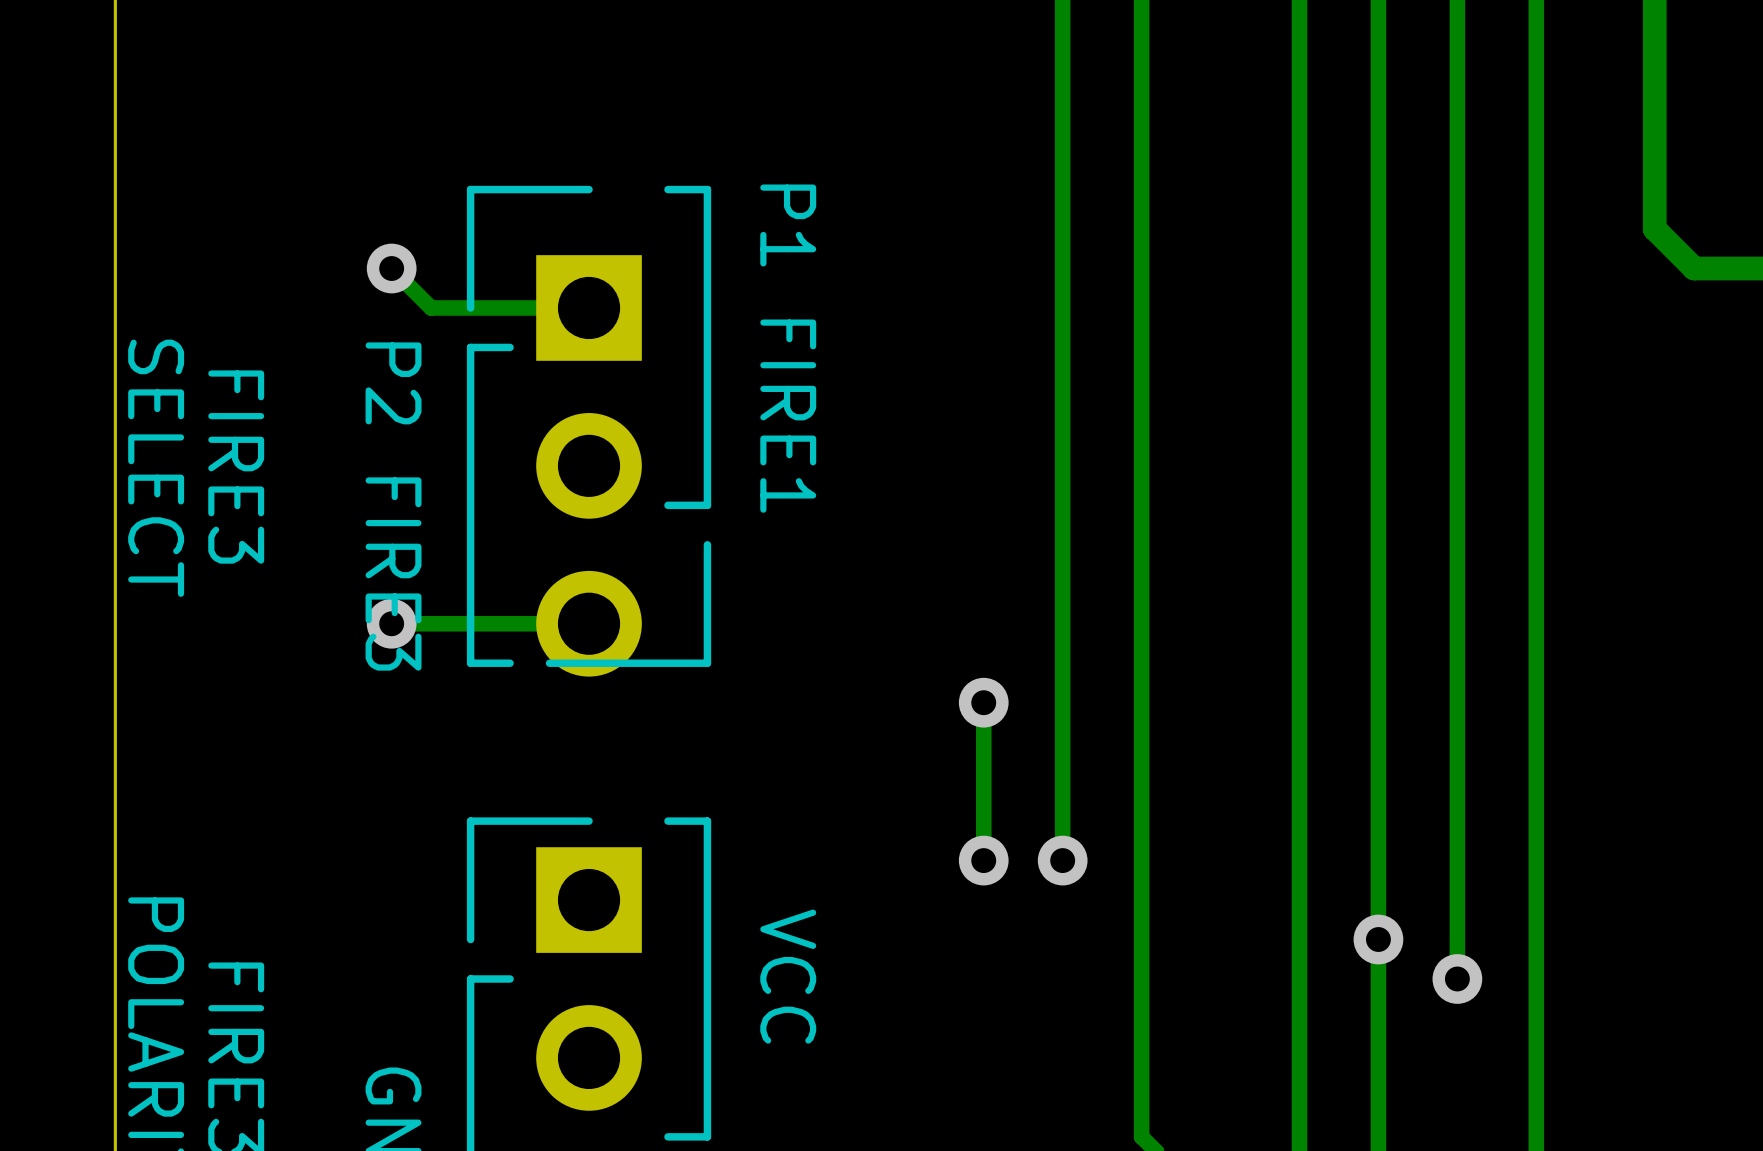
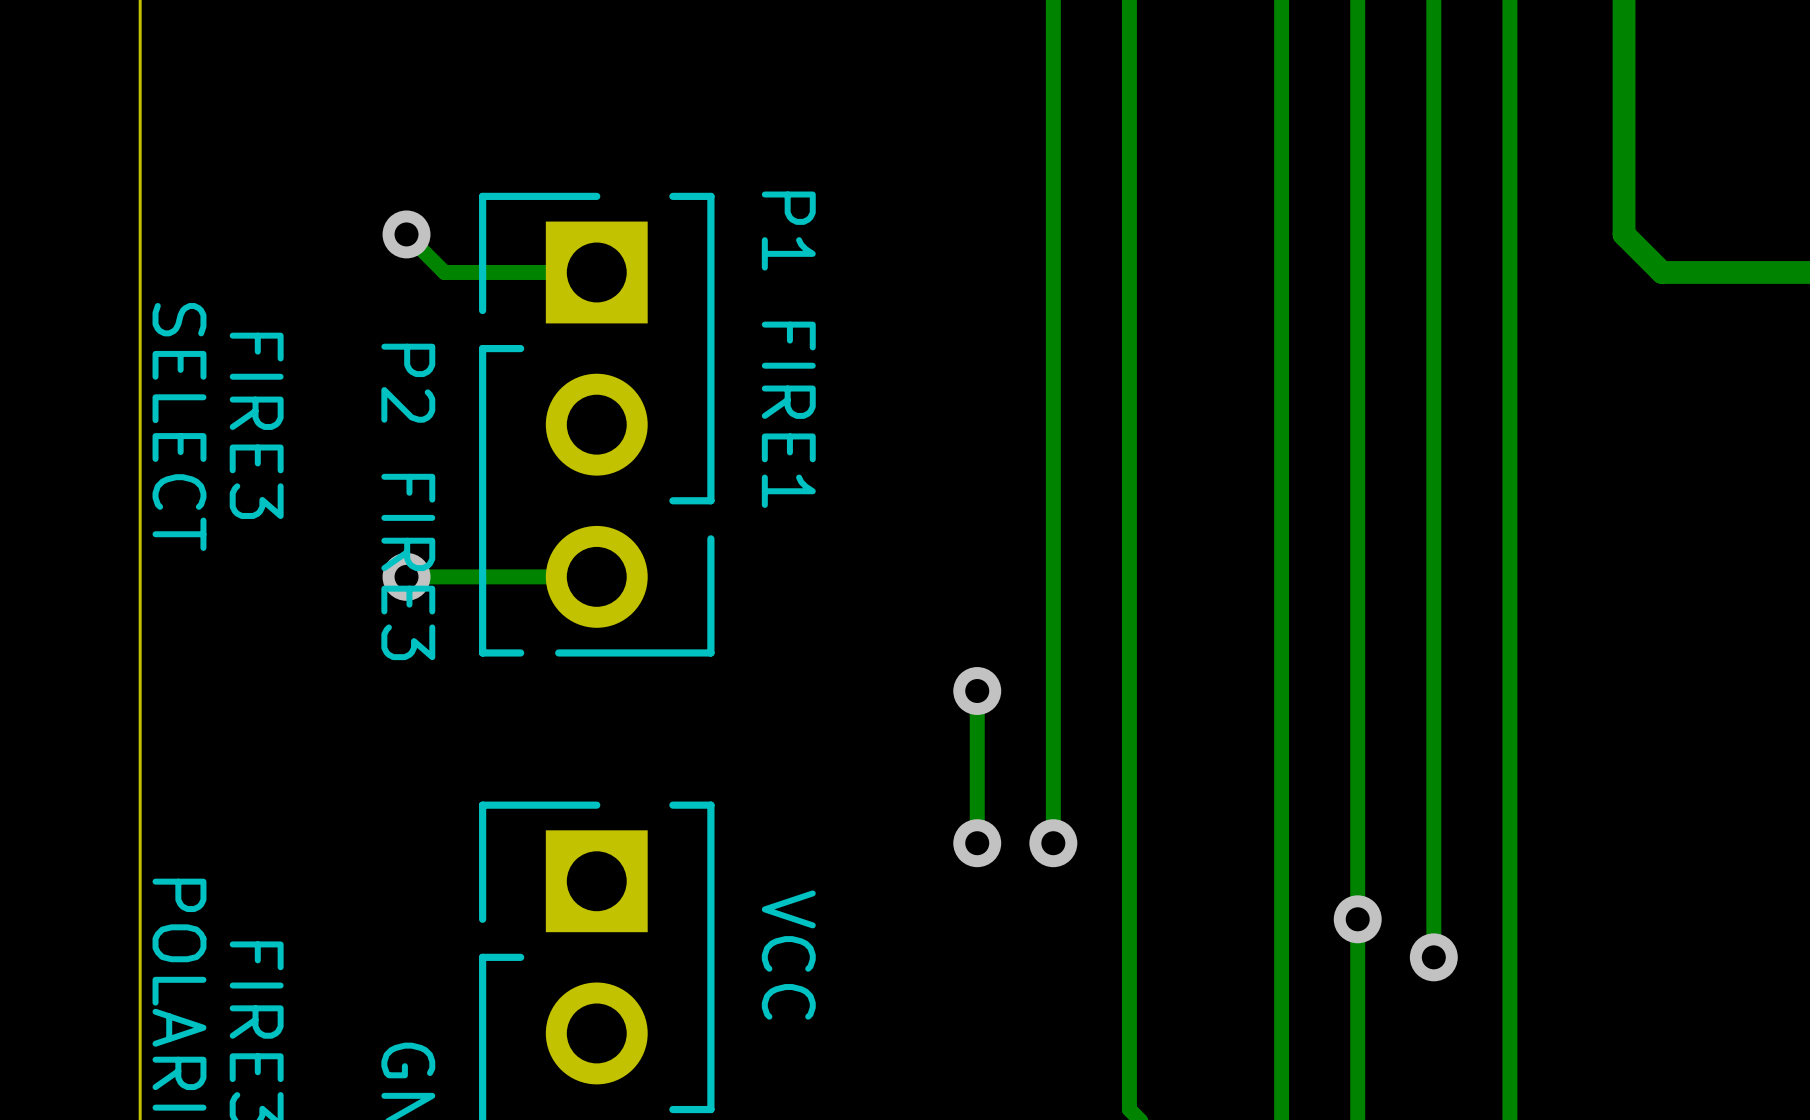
track: (391, 268) (431, 307) (589, 307) -> (406, 234) (444, 272) (596, 272)
via position: (391, 268) -> (406, 234)
part position: (589, 465) -> (596, 424)
text position: FIRE3 (236, 467) -> FIRE3 (256, 425)
text position: SELECT (156, 468) -> SELECT (179, 426)
via position: (391, 623) -> (406, 576)
track: (589, 623) (391, 623) -> (596, 576) (406, 576)

